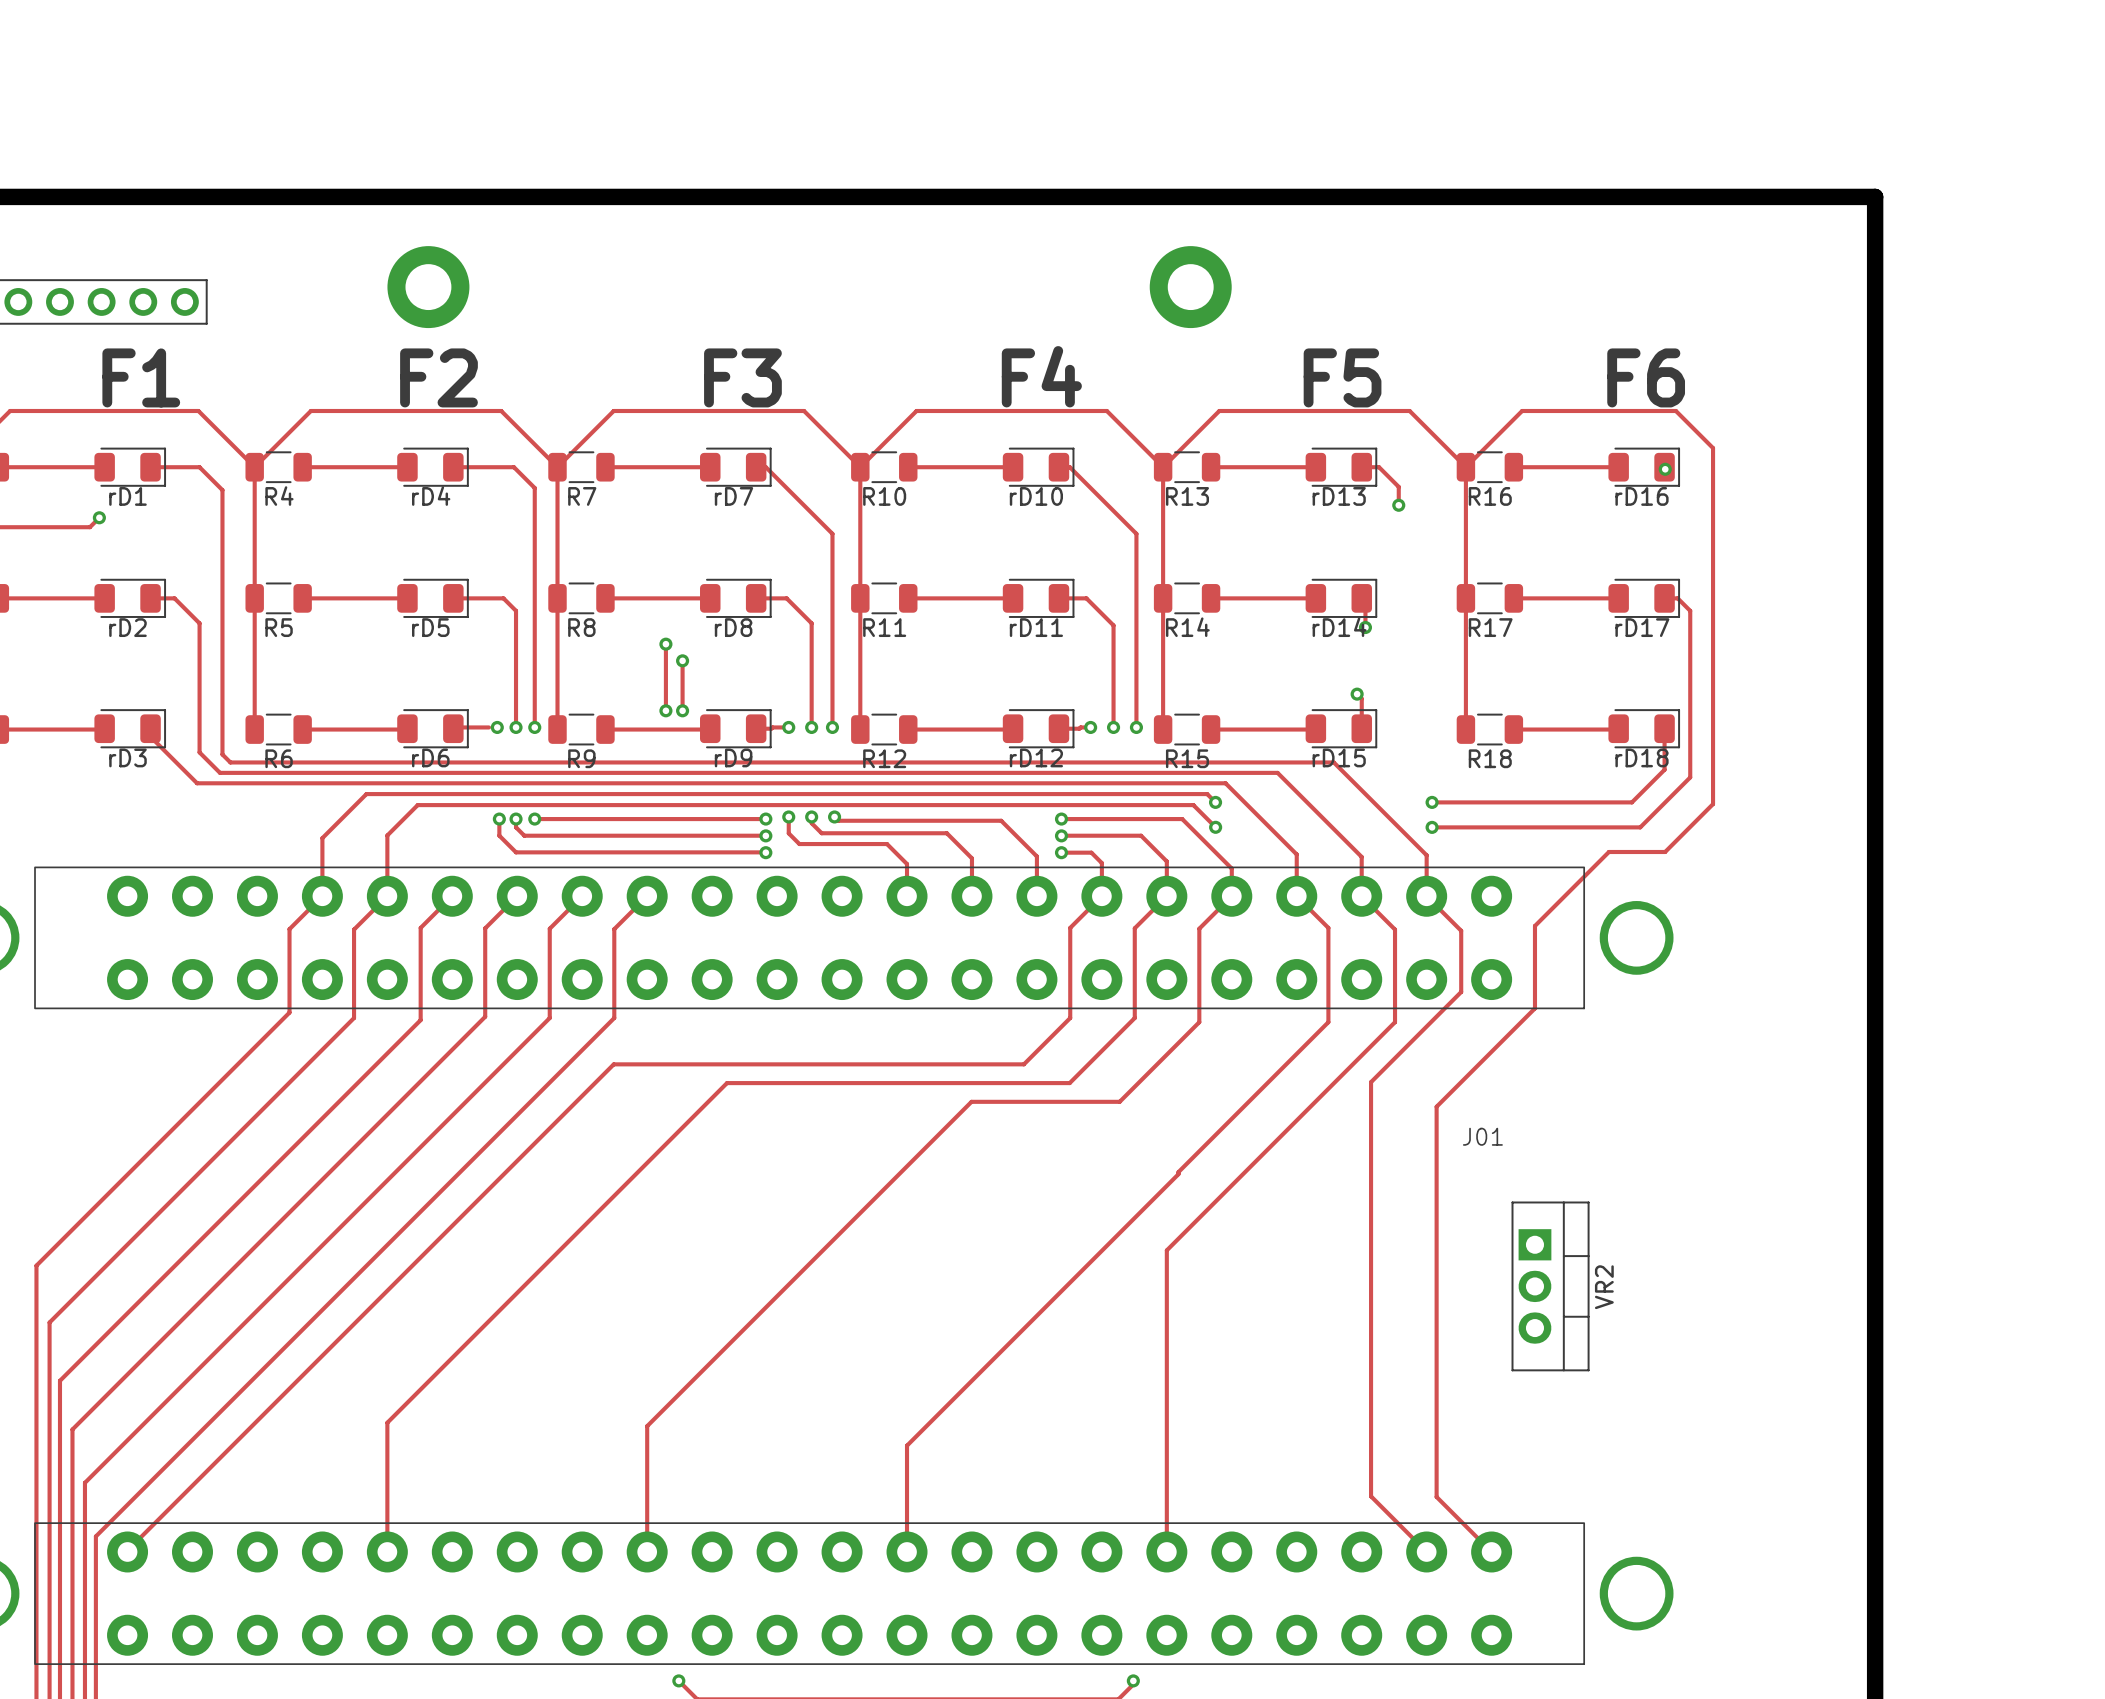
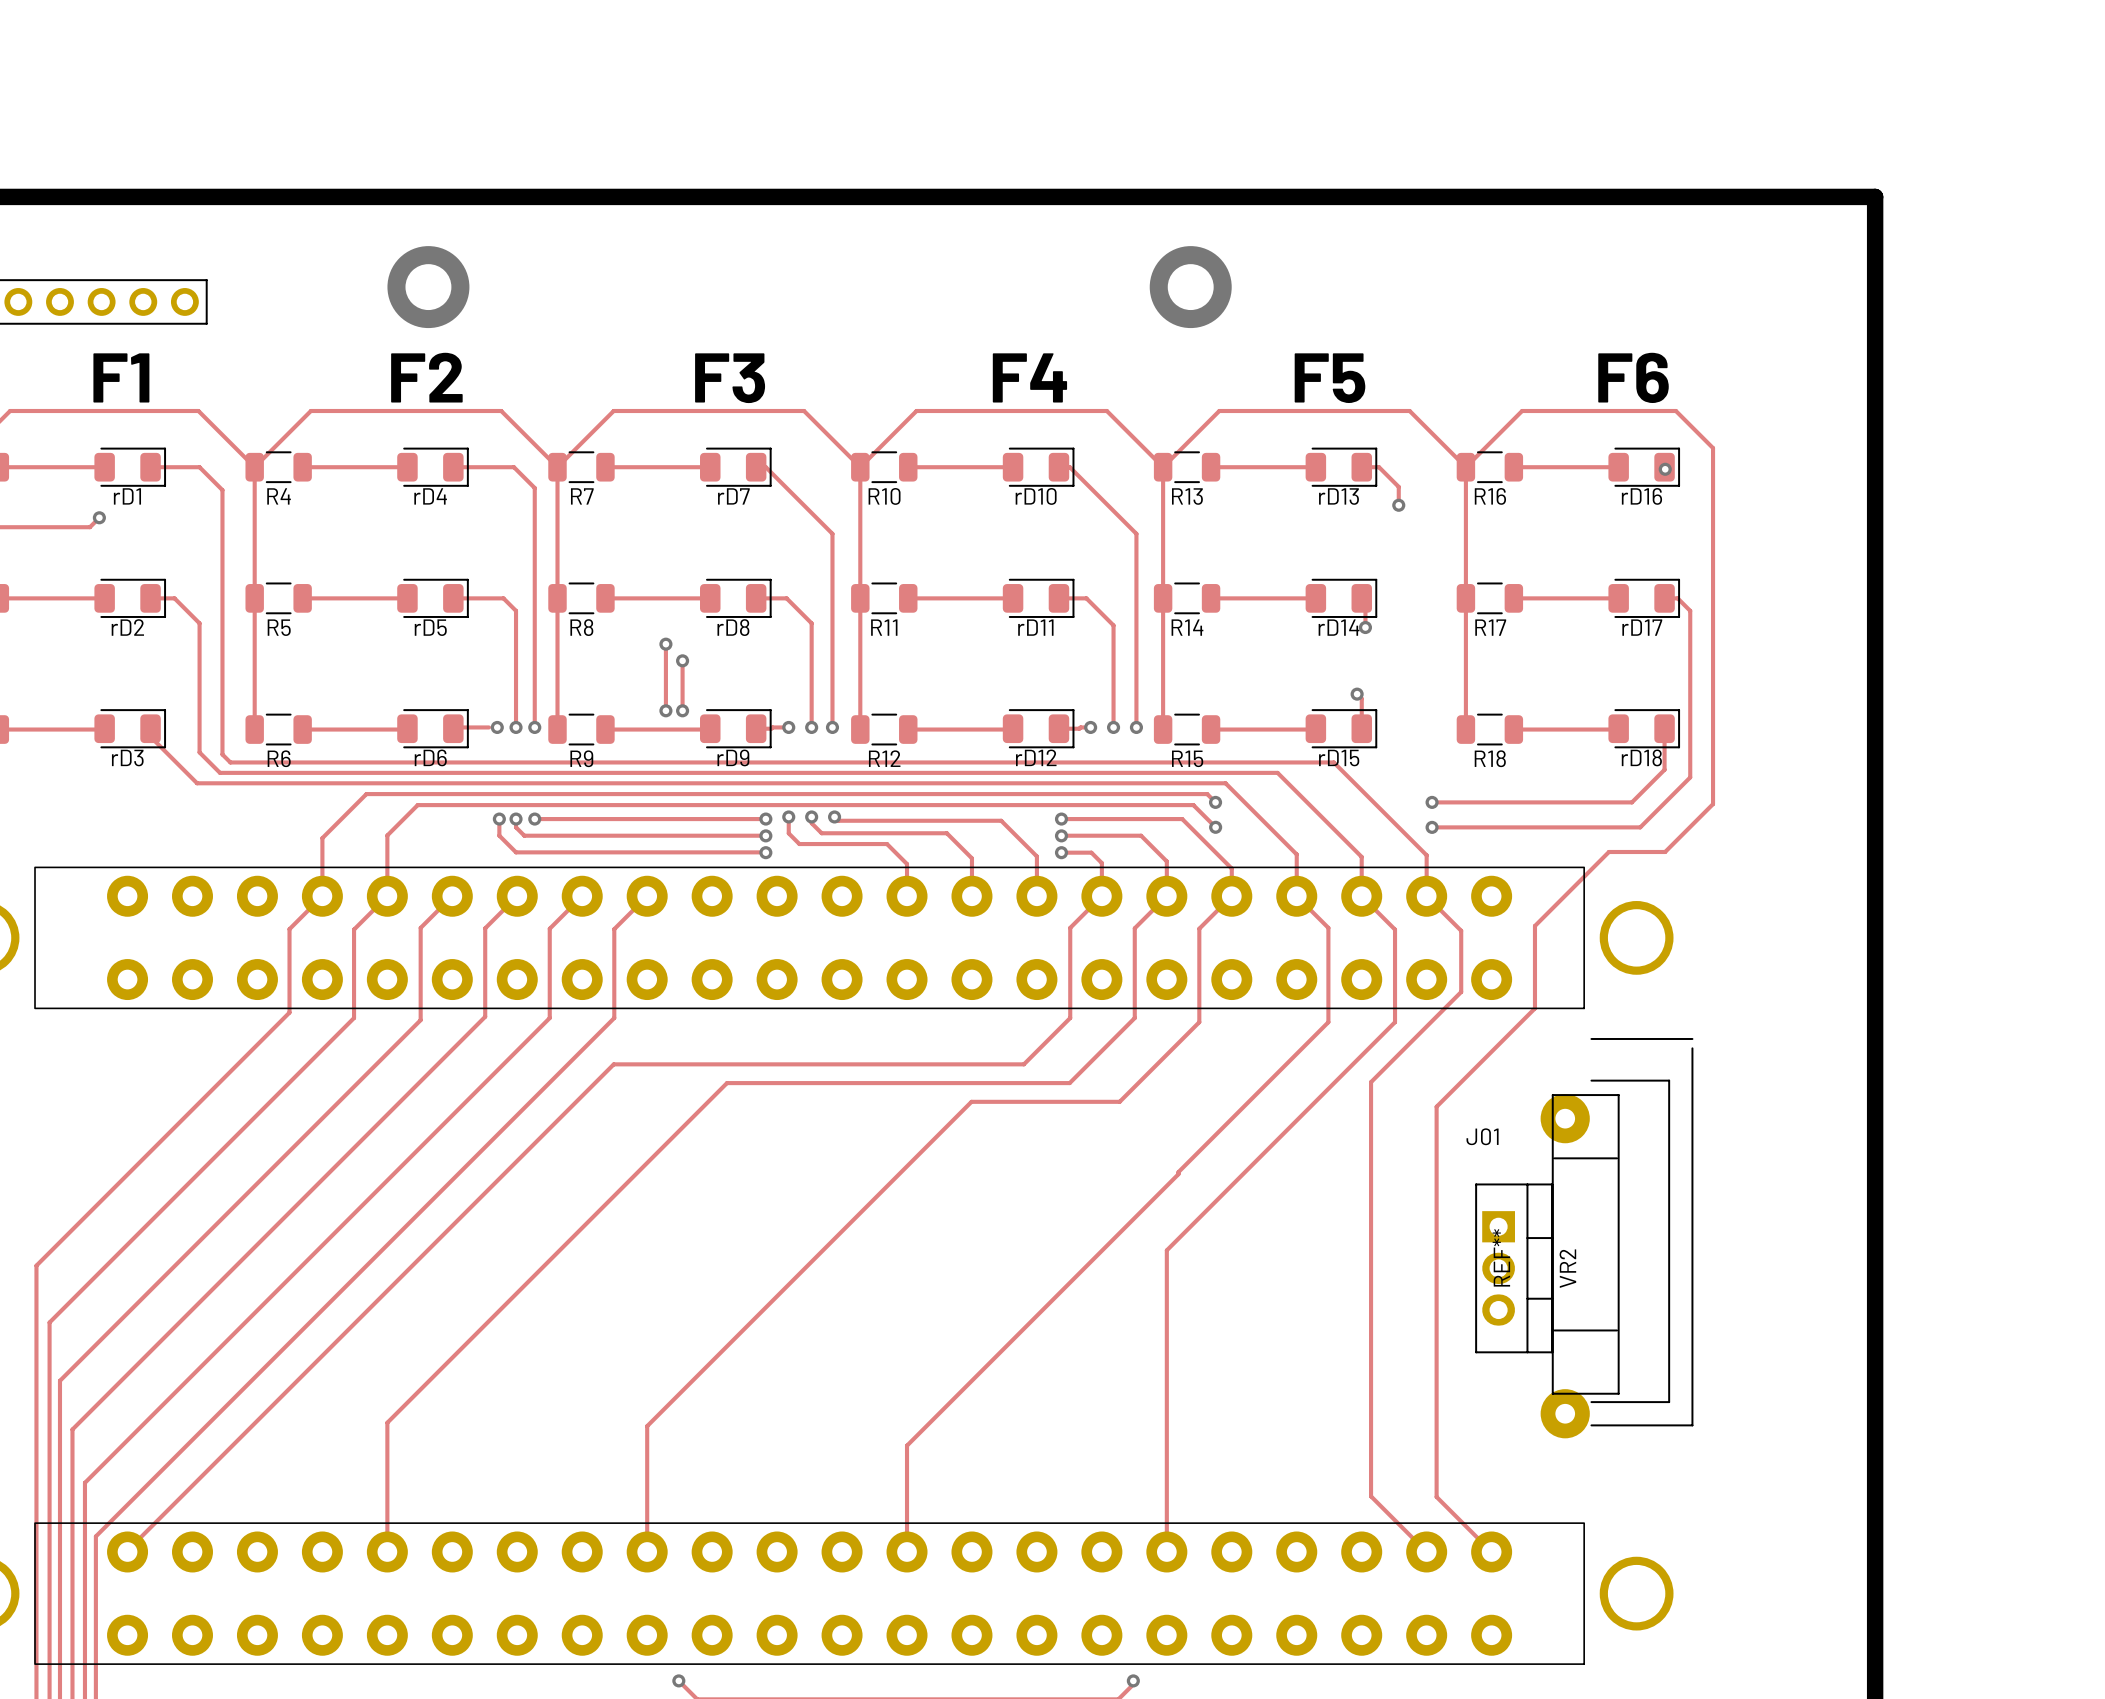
REF**: none -> (1617, 1238)
VR2 position: (1550, 1286) -> (1514, 1268)

